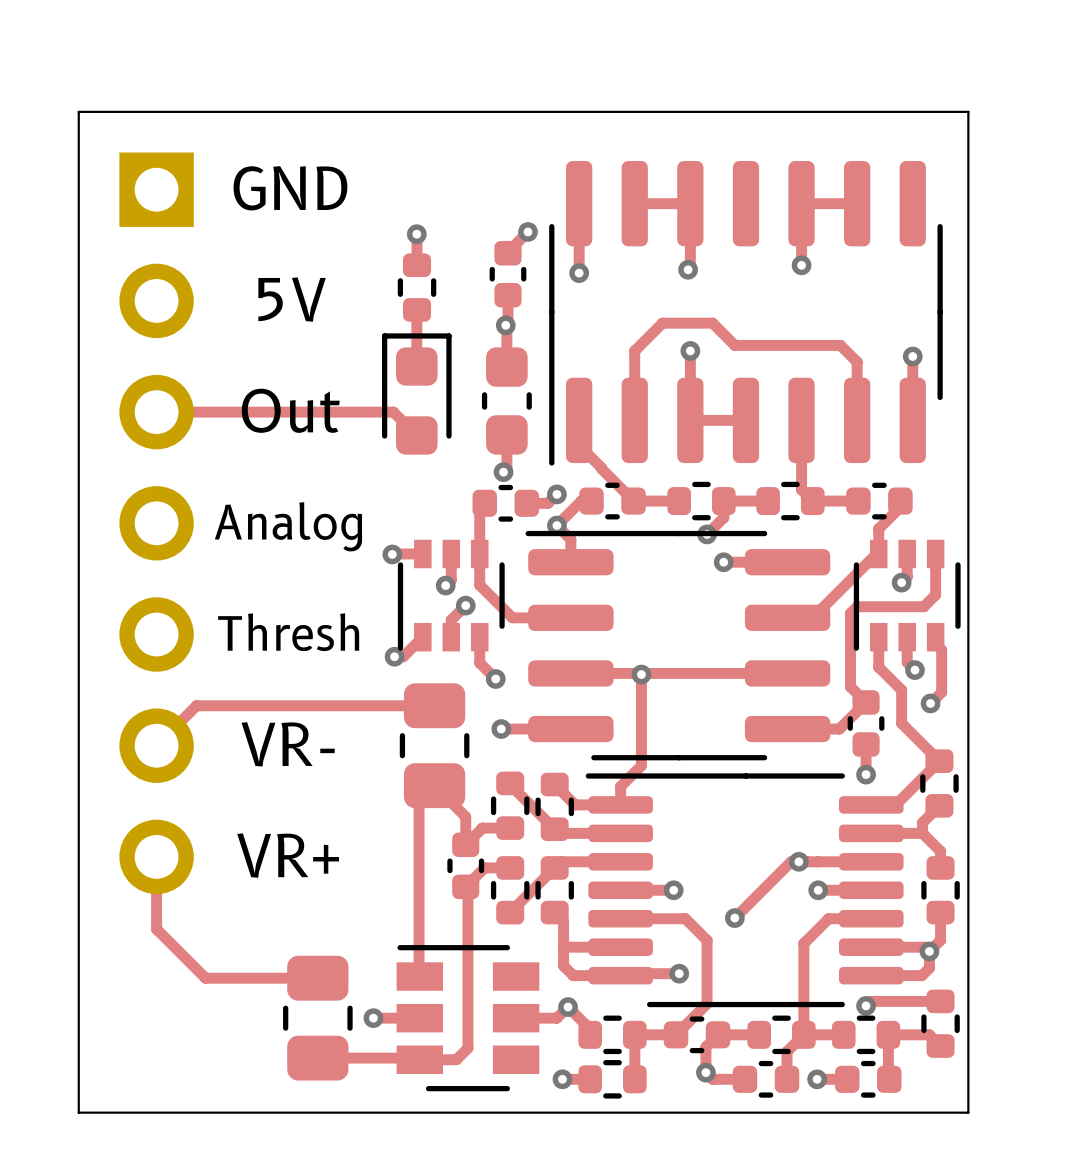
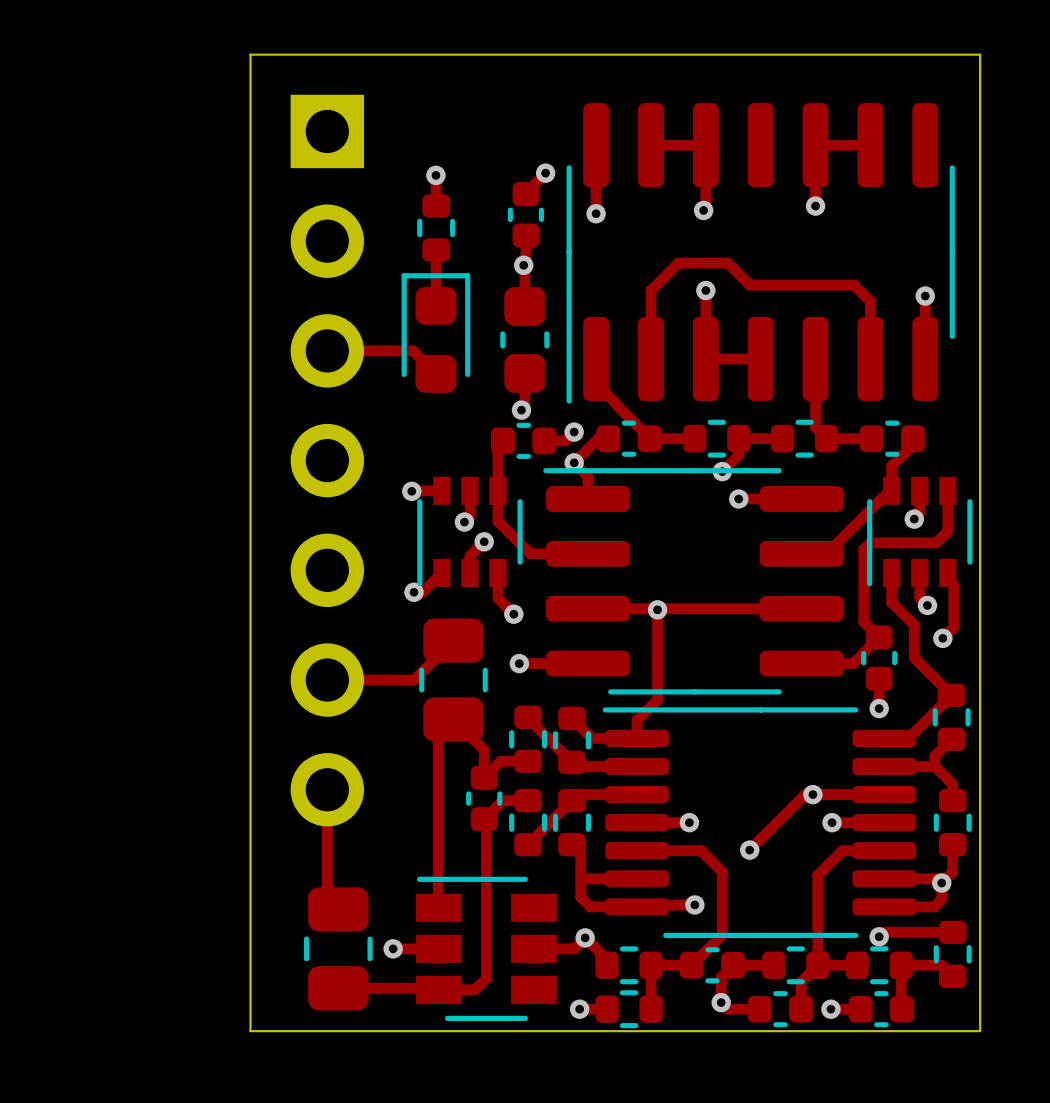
board edge: (228, 111) (78, 111) (78, 1112) (968, 1112) (968, 1101) -> (250, 54) (250, 1031) (980, 1031)
text: GND (290, 188) -> none
text: 5V (292, 299) -> none
text: Out (290, 410) -> none
track: (156, 412) (306, 412) -> none
part position: (156, 523) -> (327, 460)
text: Analog (288, 526) -> none
text: Thresh (288, 632) -> none
track: (434, 705) (196, 705) (156, 745) -> (453, 640) (414, 680) (327, 680)
text: VR- (288, 744) -> none
text: VR+ (288, 855) -> none
track: (156, 856) (156, 929) (205, 978) (317, 978) -> (327, 789) (327, 898) (338, 909)

